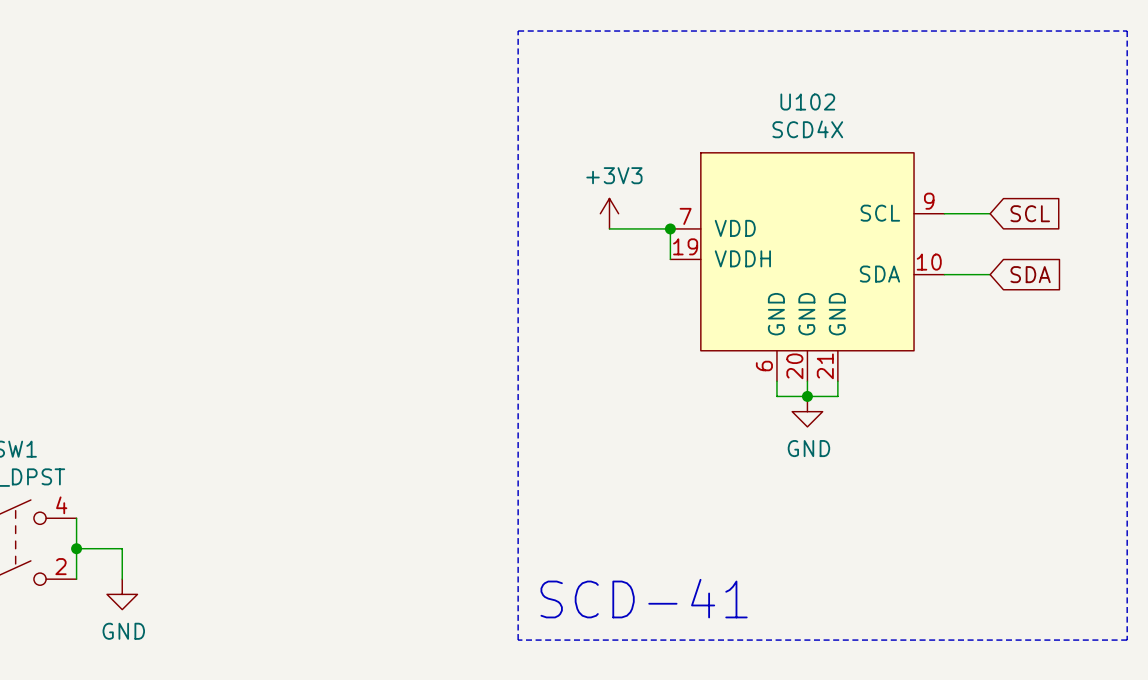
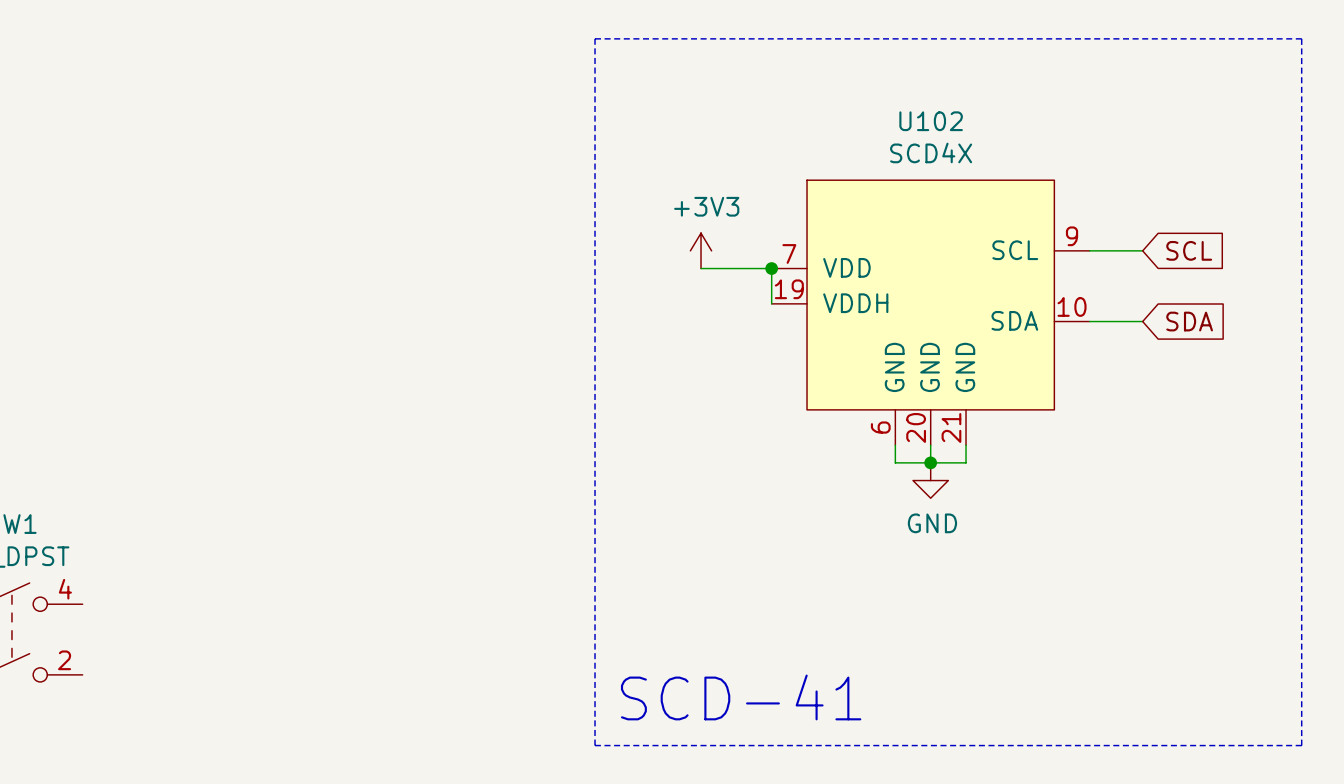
wire: (76, 518) (76, 579) -> none
wire: (76, 548) (122, 548) (122, 579) -> none
junction: (76, 548) -> none
power symbol: GND (122, 594) -> none

